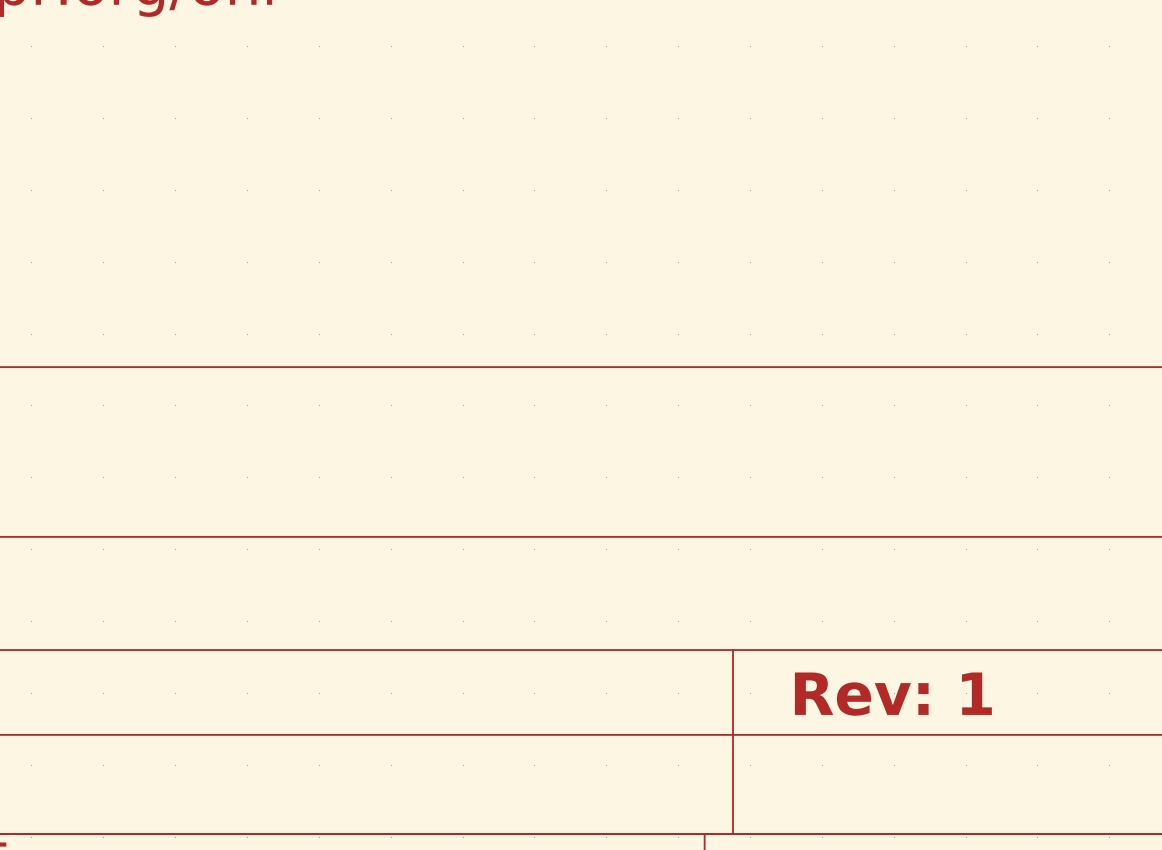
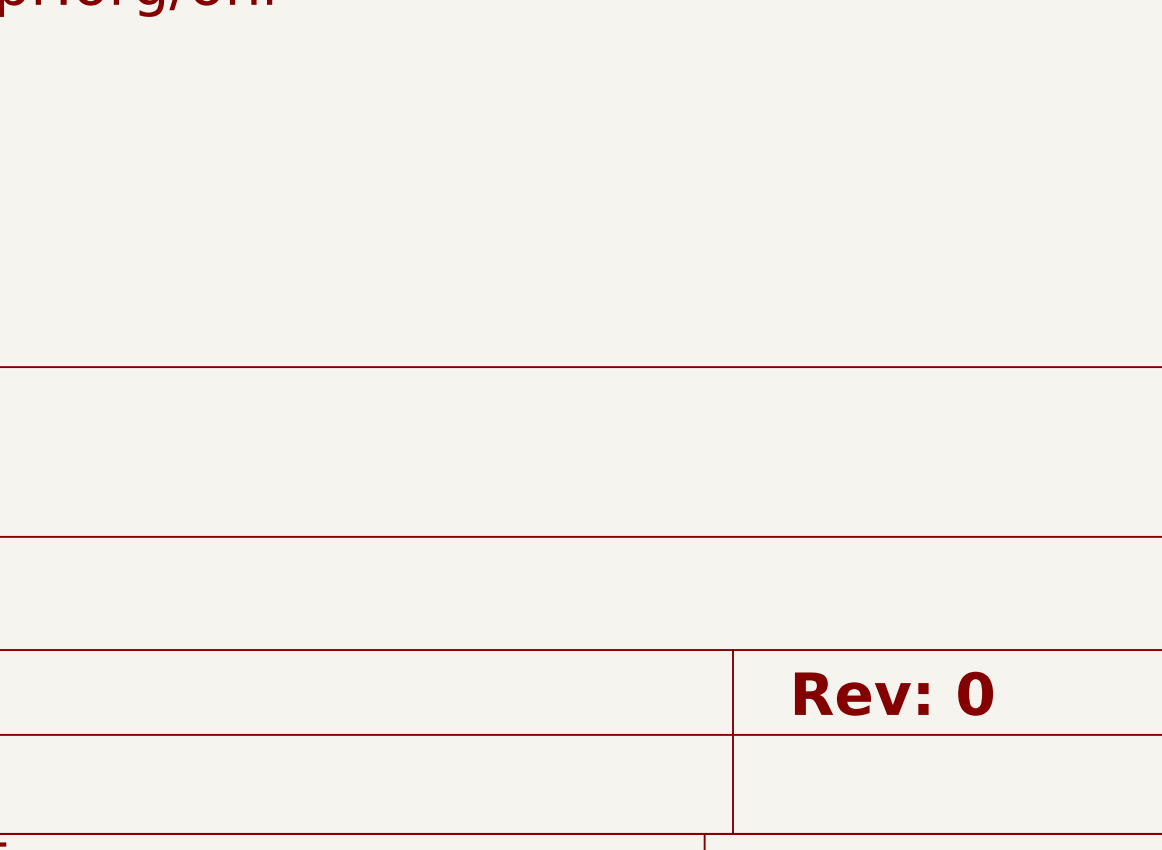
title block: Rev: 1 (893, 694) -> Rev: 0 (894, 693)

